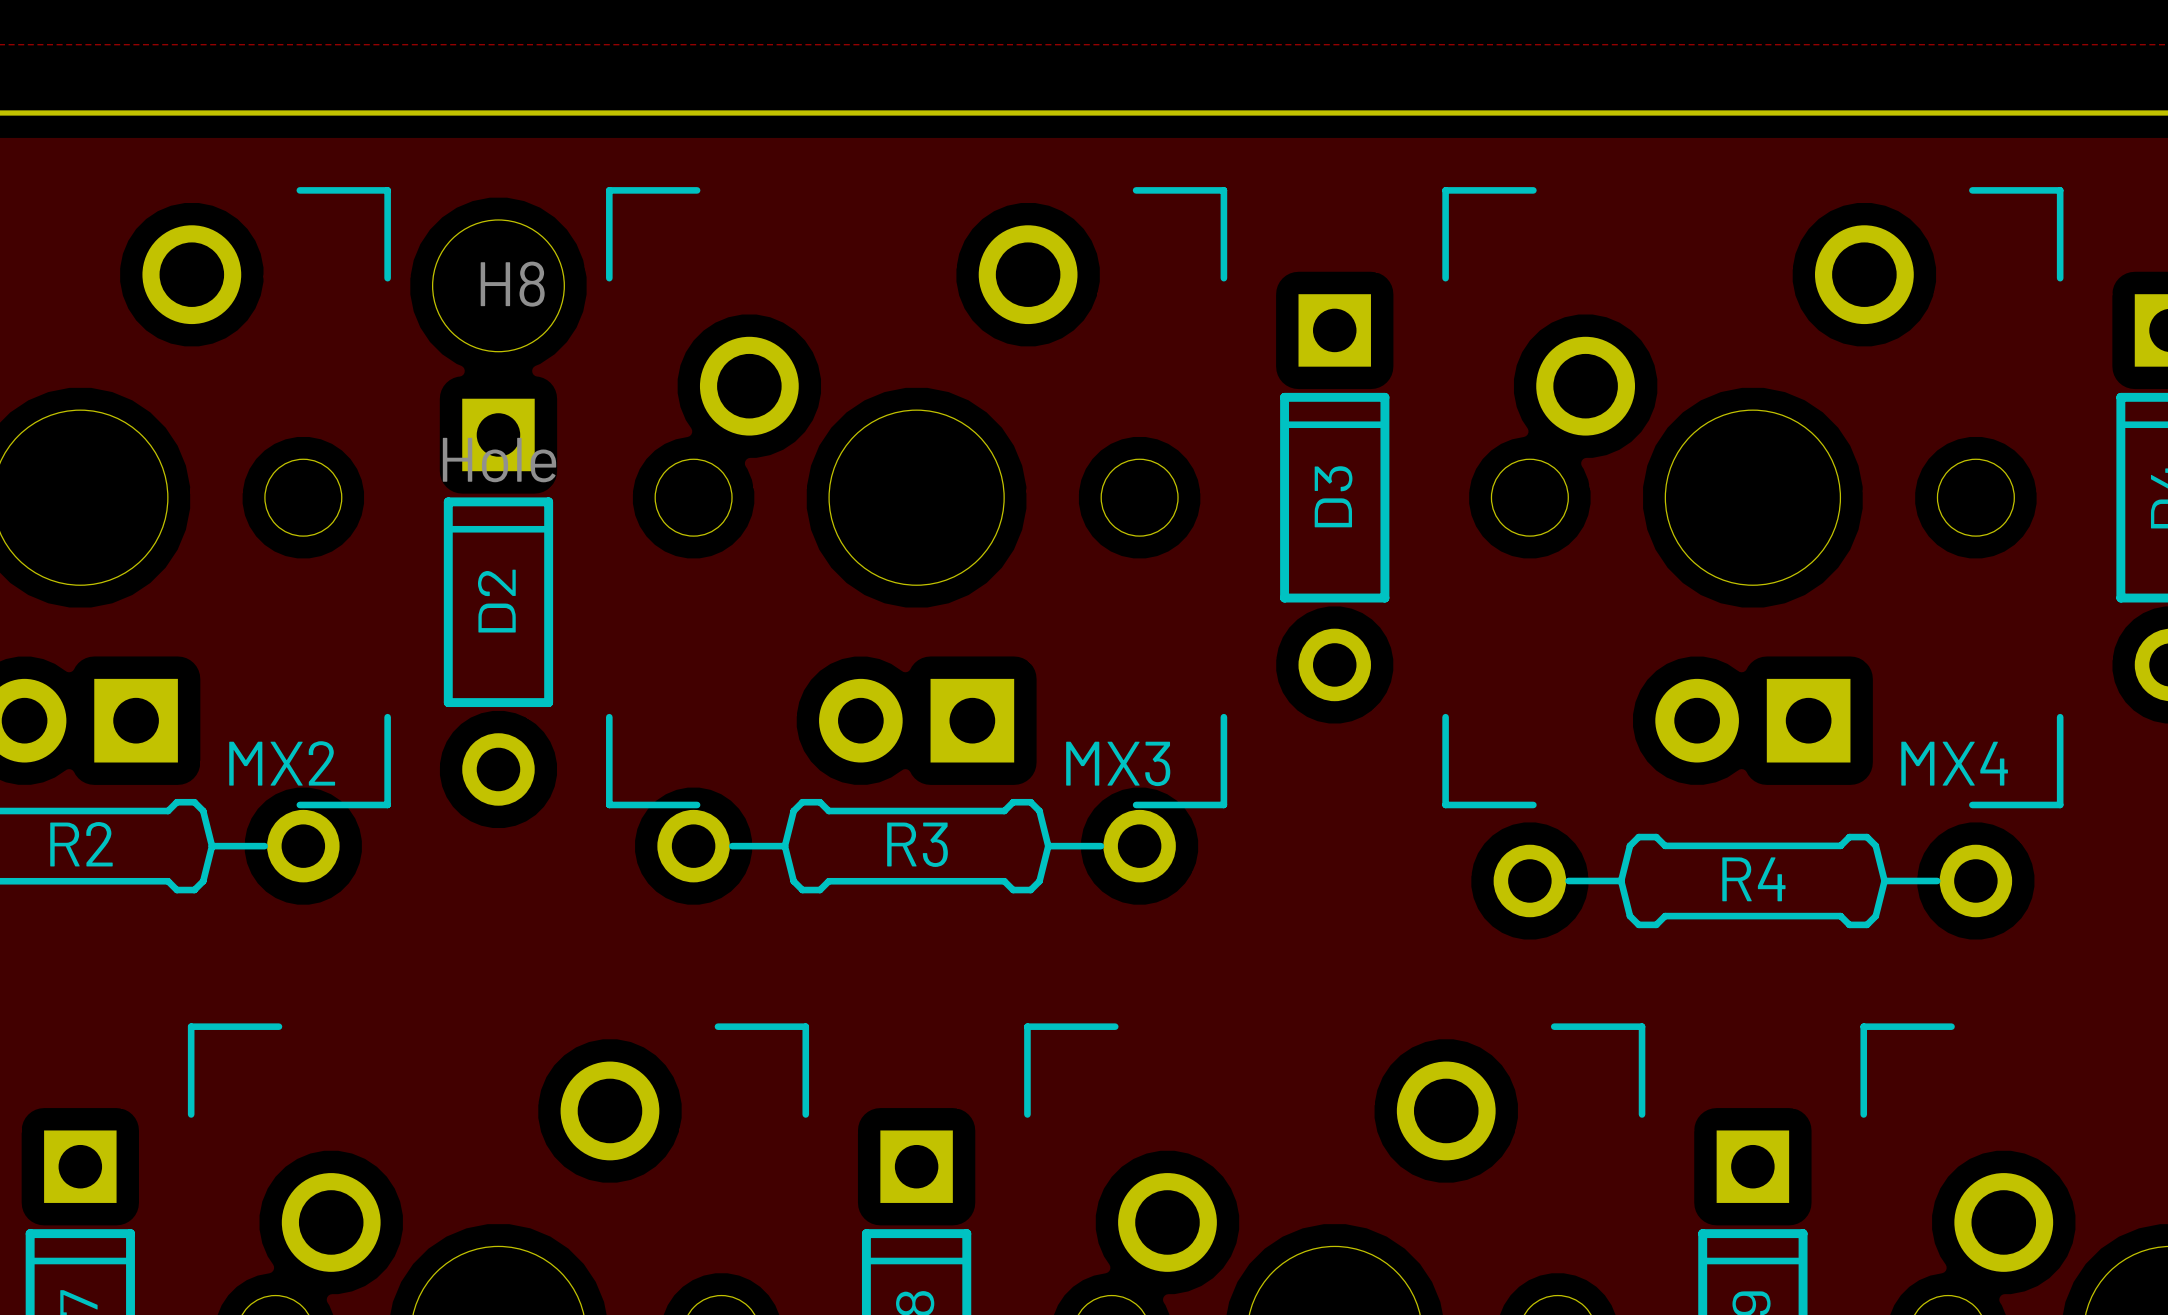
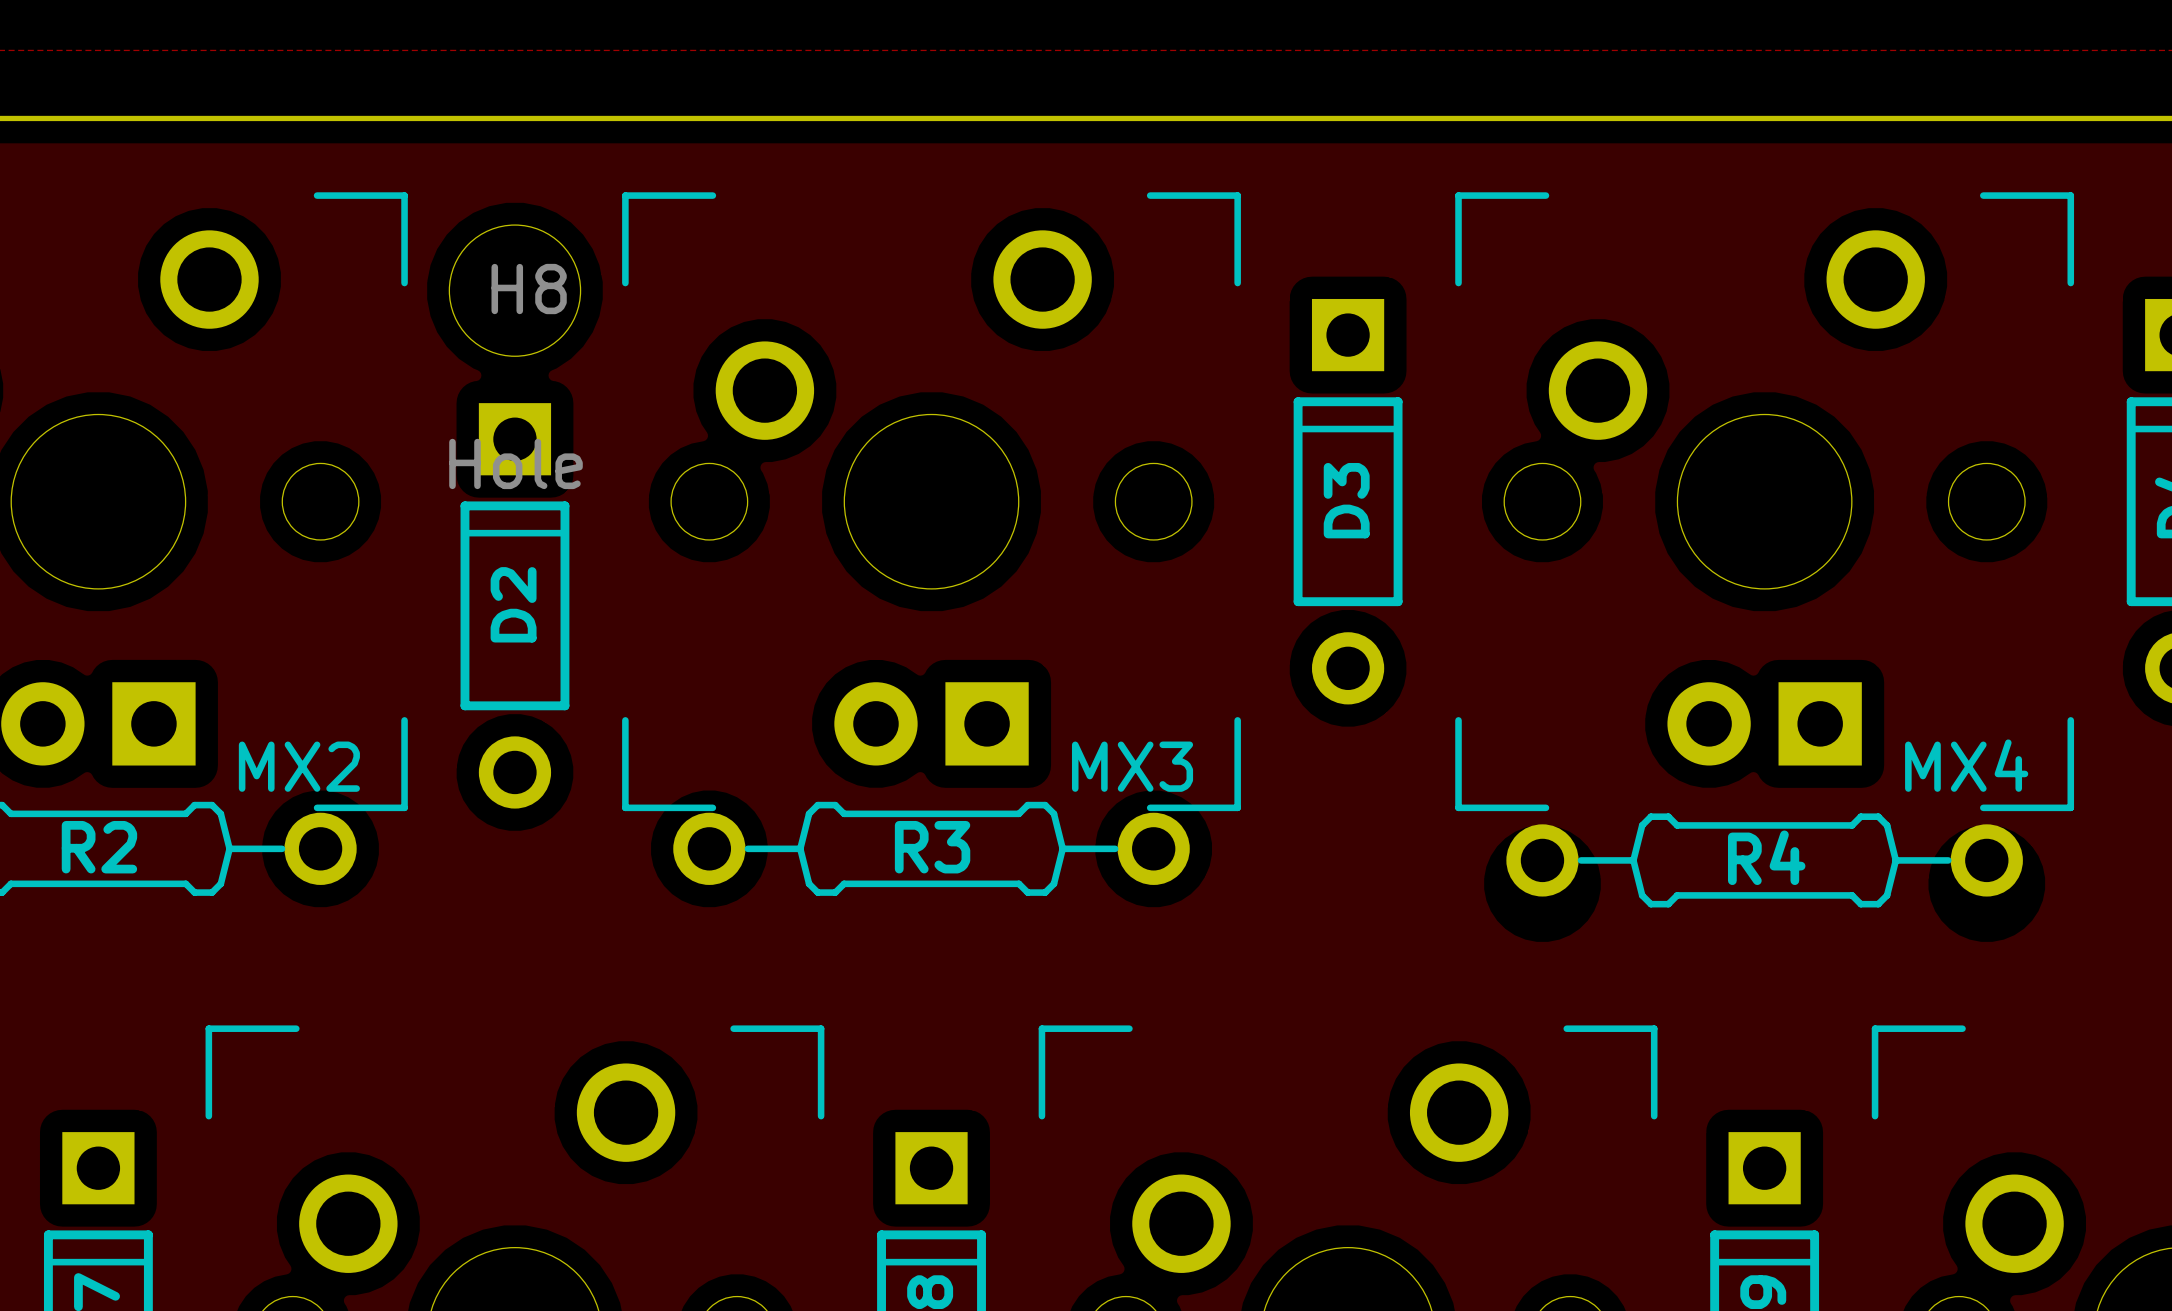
R4 position: (1752, 880) -> (1764, 860)

